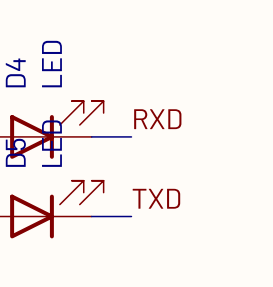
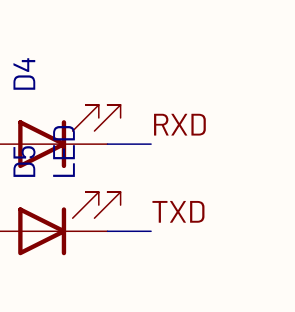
D4 value: LED (51, 64) -> none

